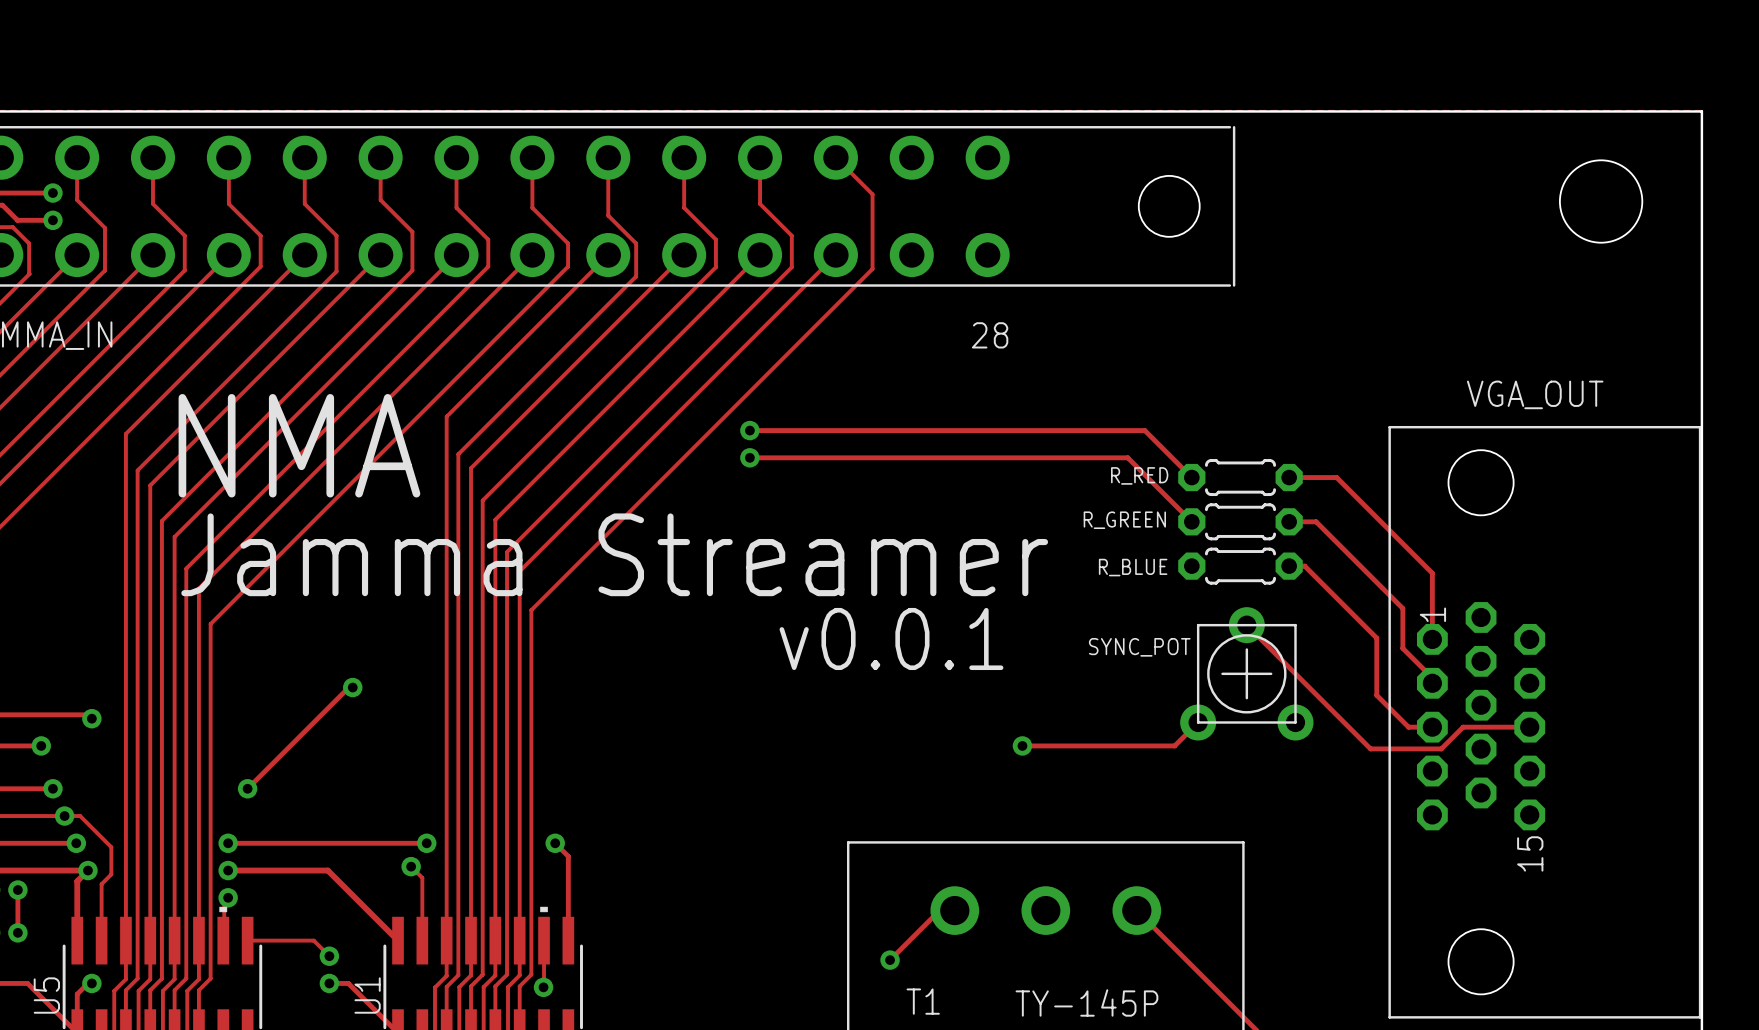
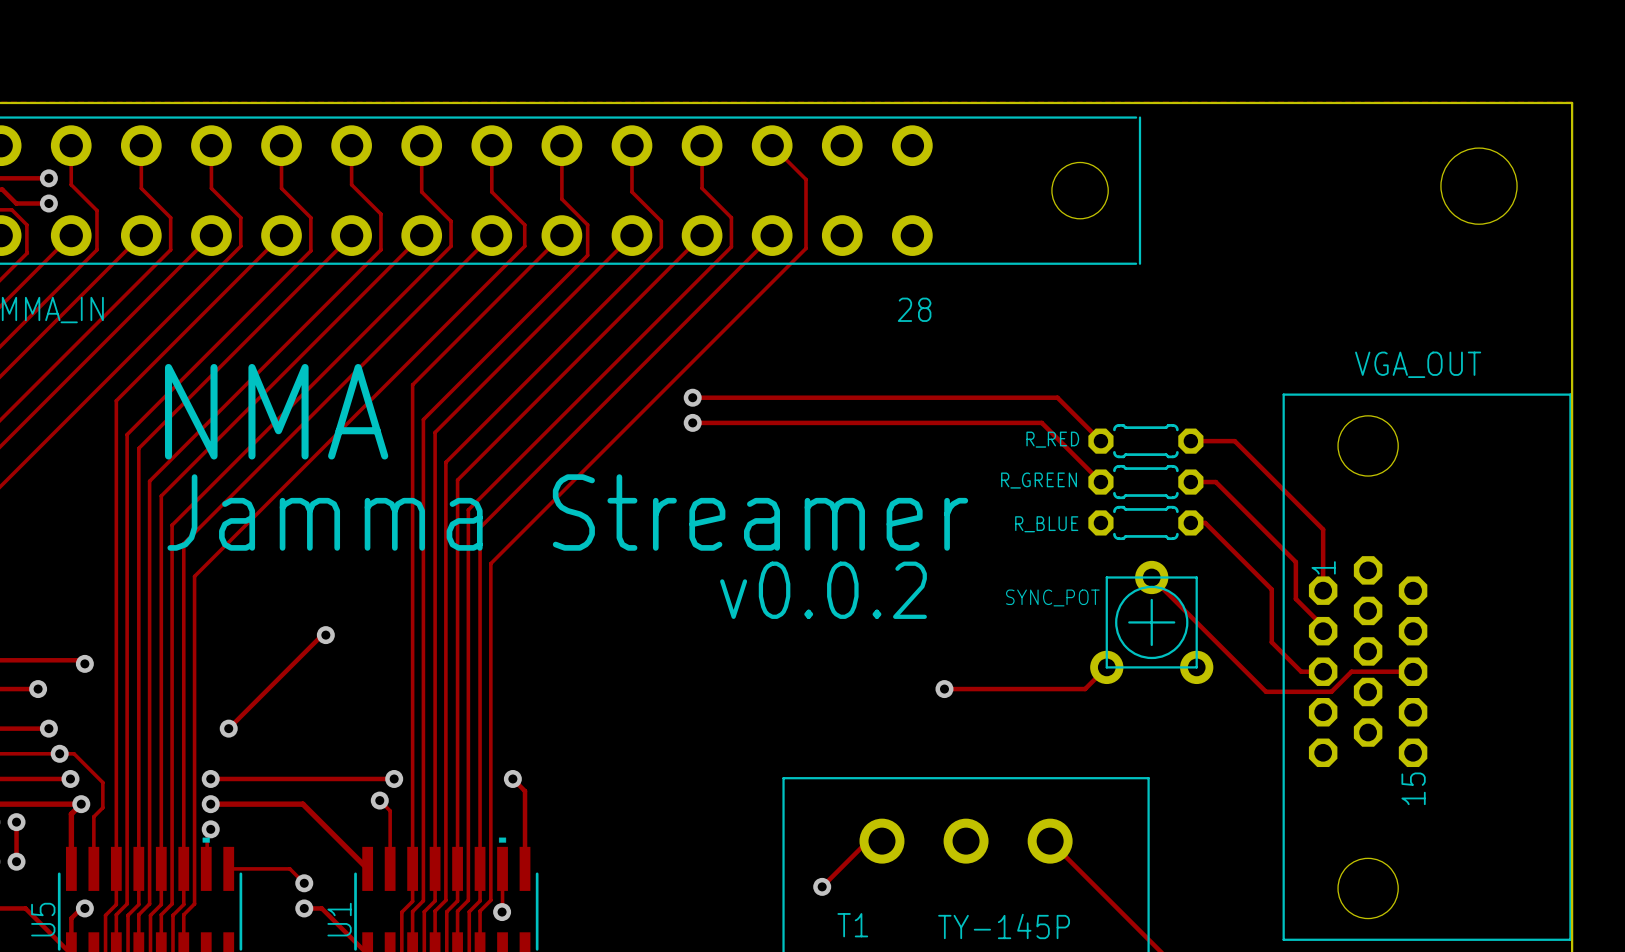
text: v0.0.1 (891, 638) -> v0.0.2 (823, 590)

